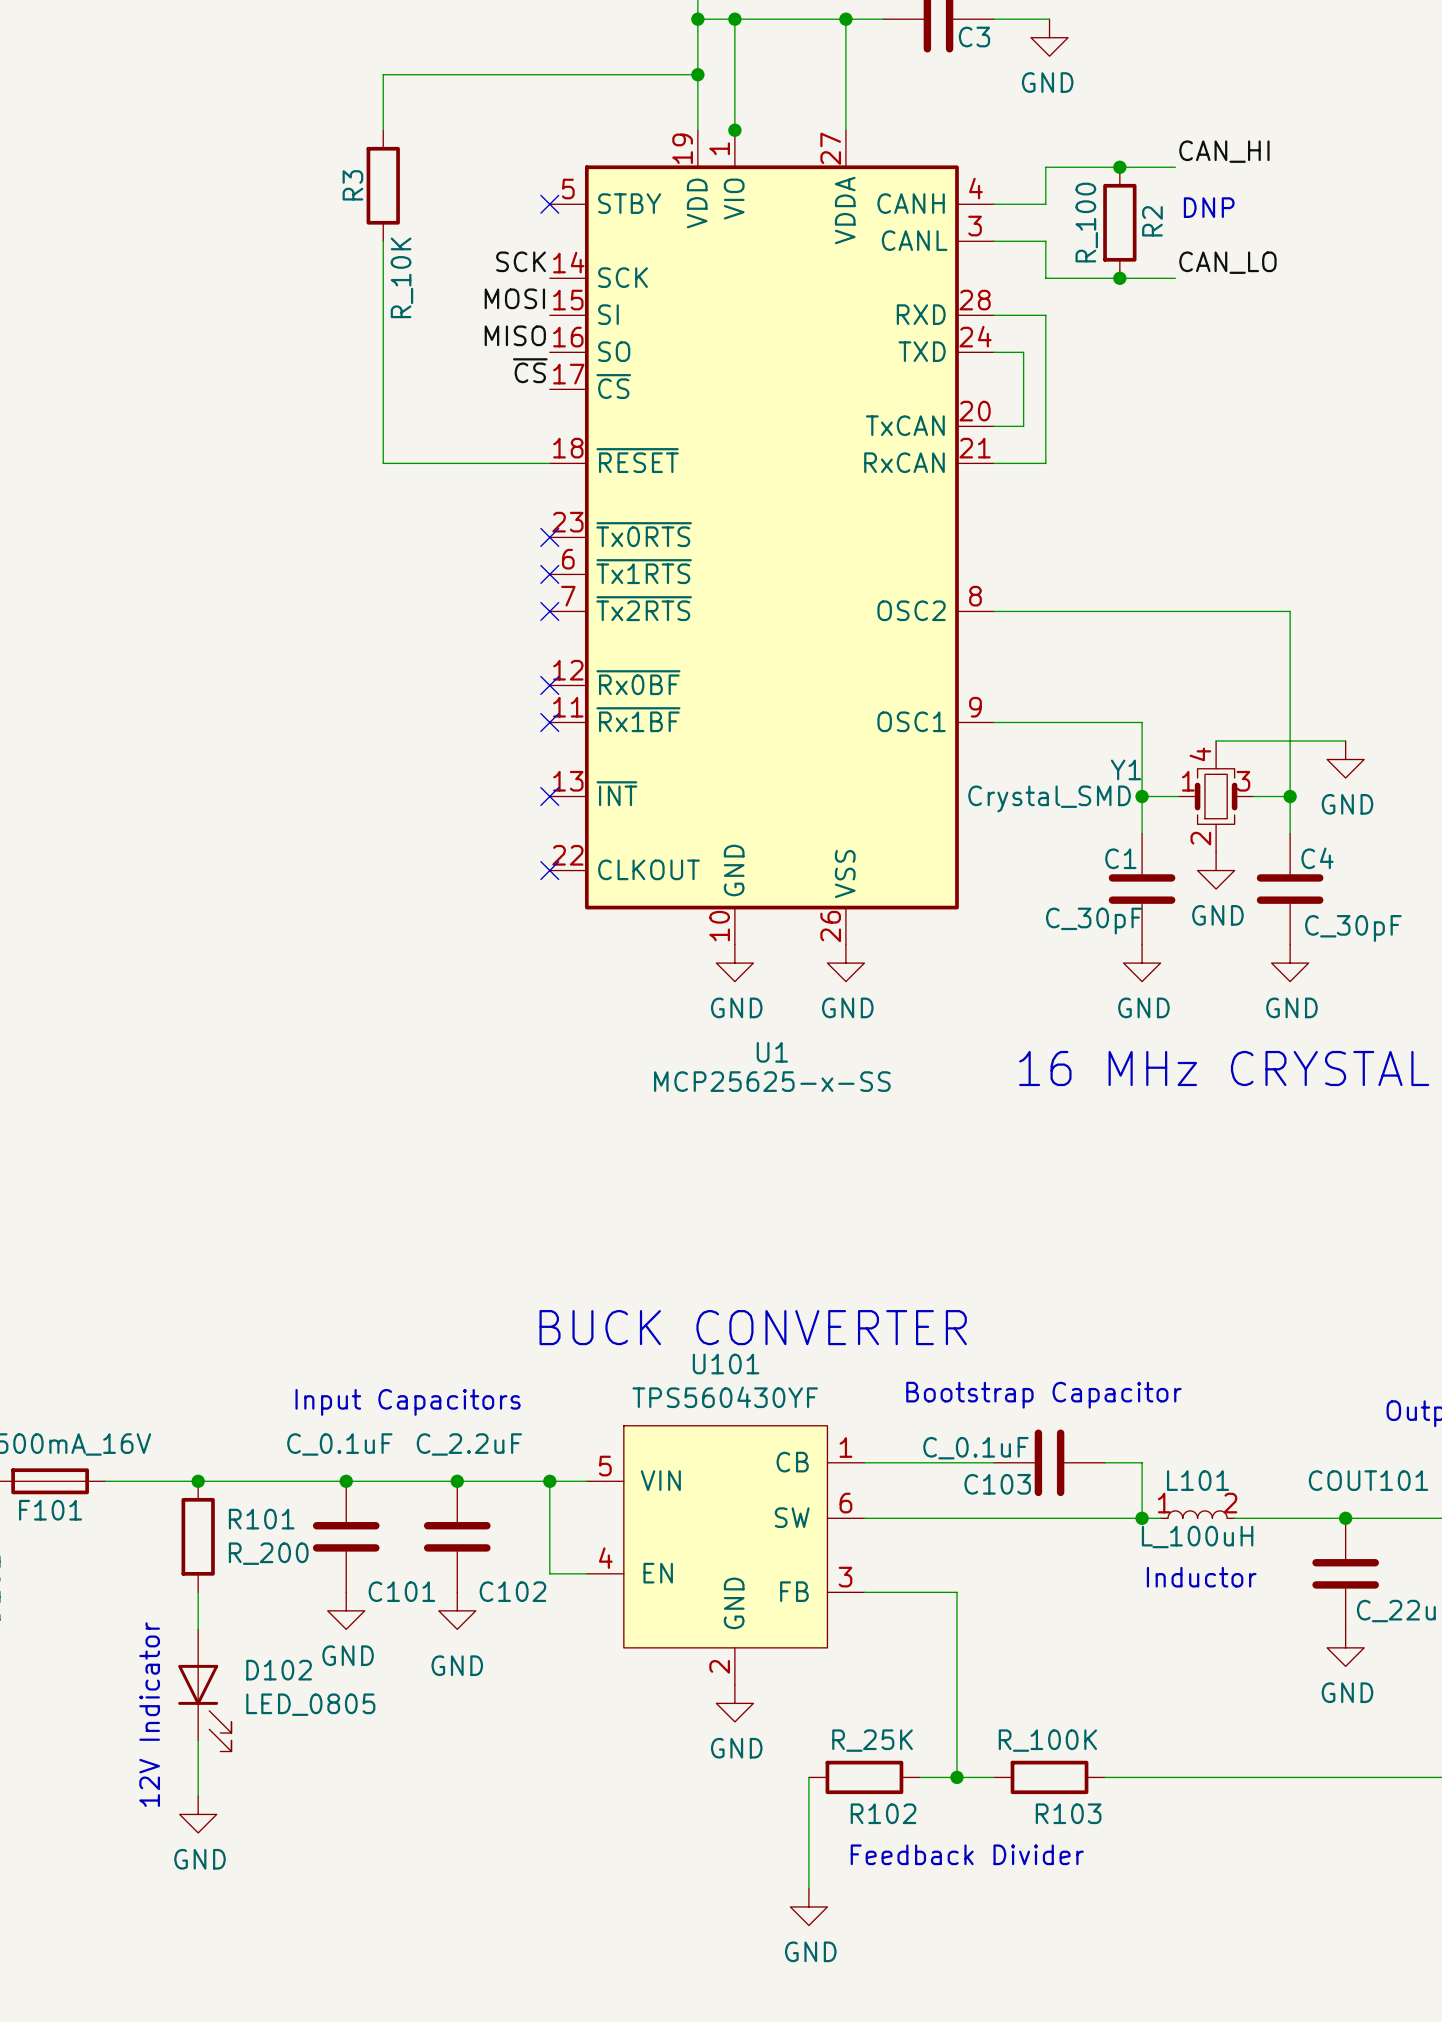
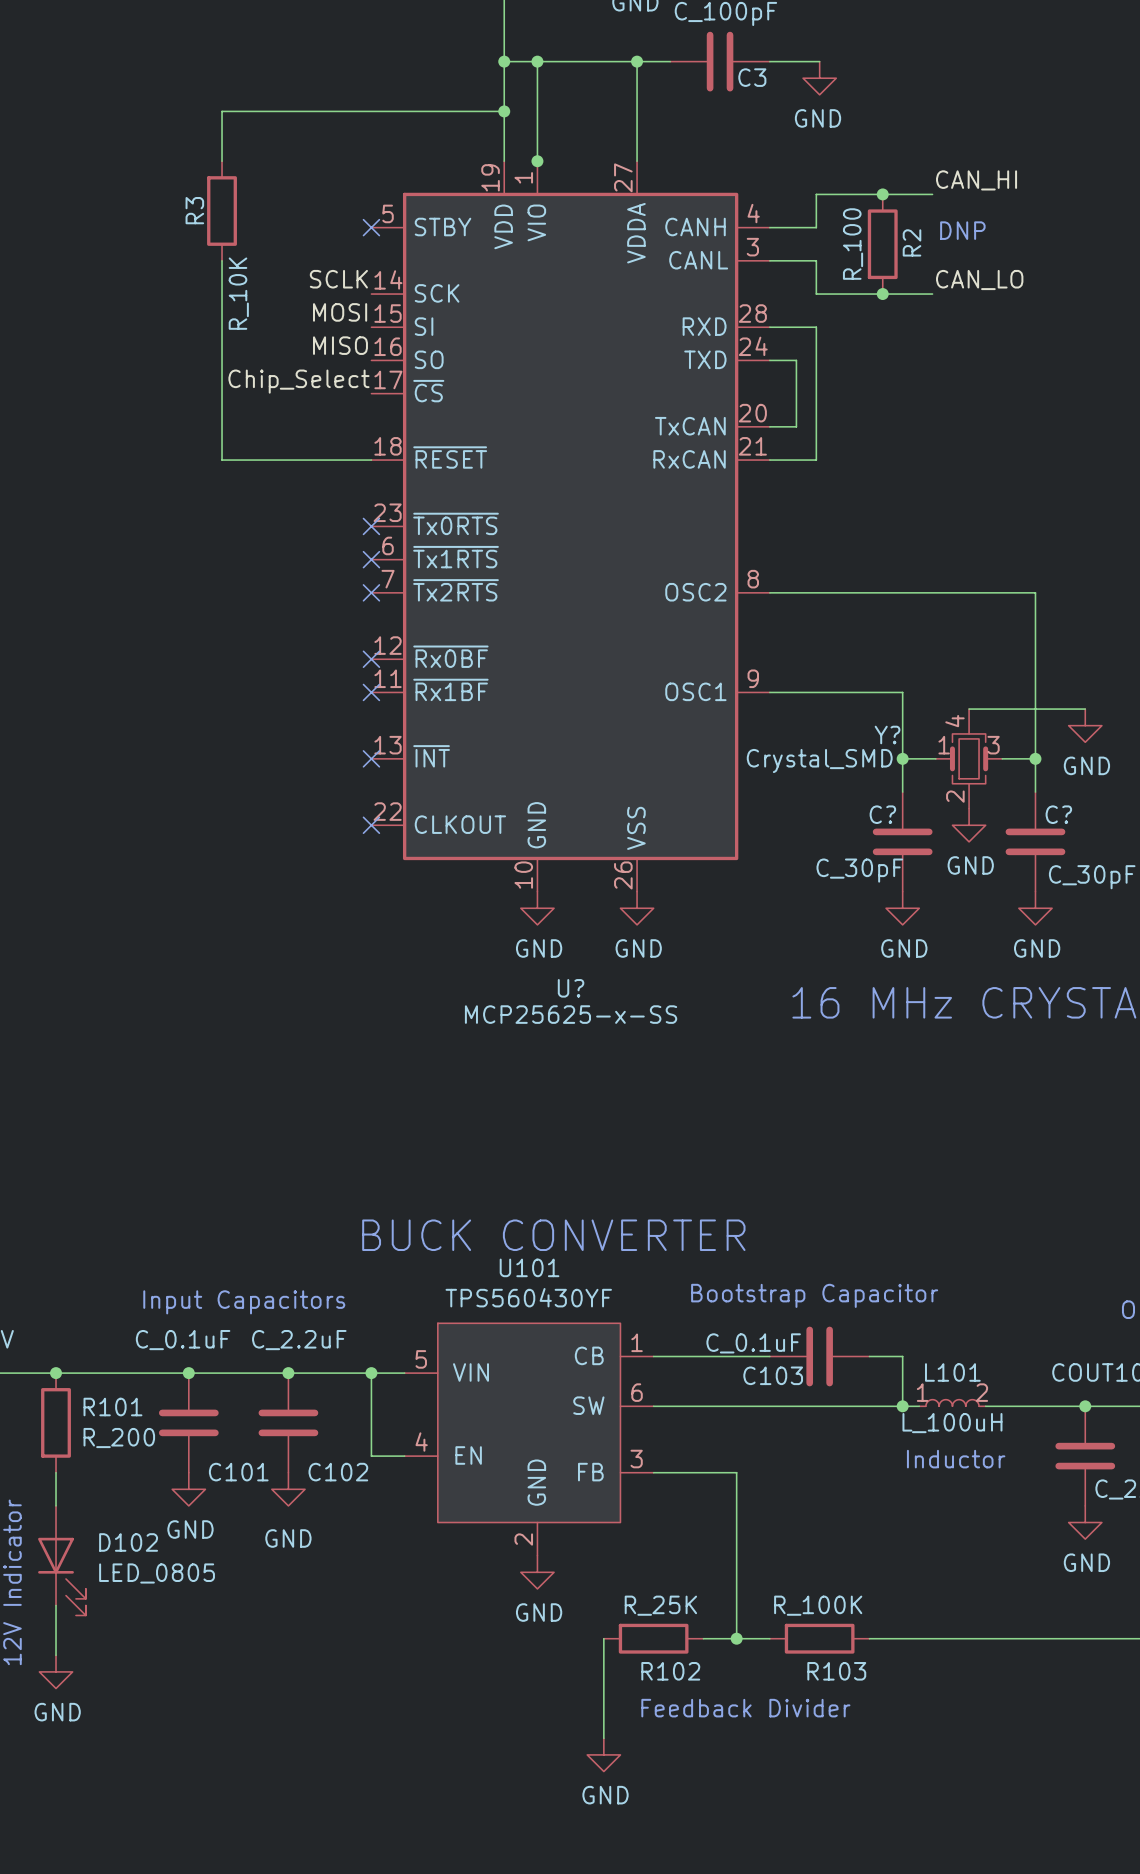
label: SCK (521, 261) -> SCLK (338, 279)
label: ~{CS} (530, 370) -> Chip_Select (298, 381)
Y1 name: Y1 (1126, 769) -> Y? (887, 735)
C1 name: C1 (1120, 858) -> C? (882, 814)
C4 name: C4 (1317, 858) -> C? (1058, 814)
U1 name: U1 (772, 1052) -> U? (571, 988)

